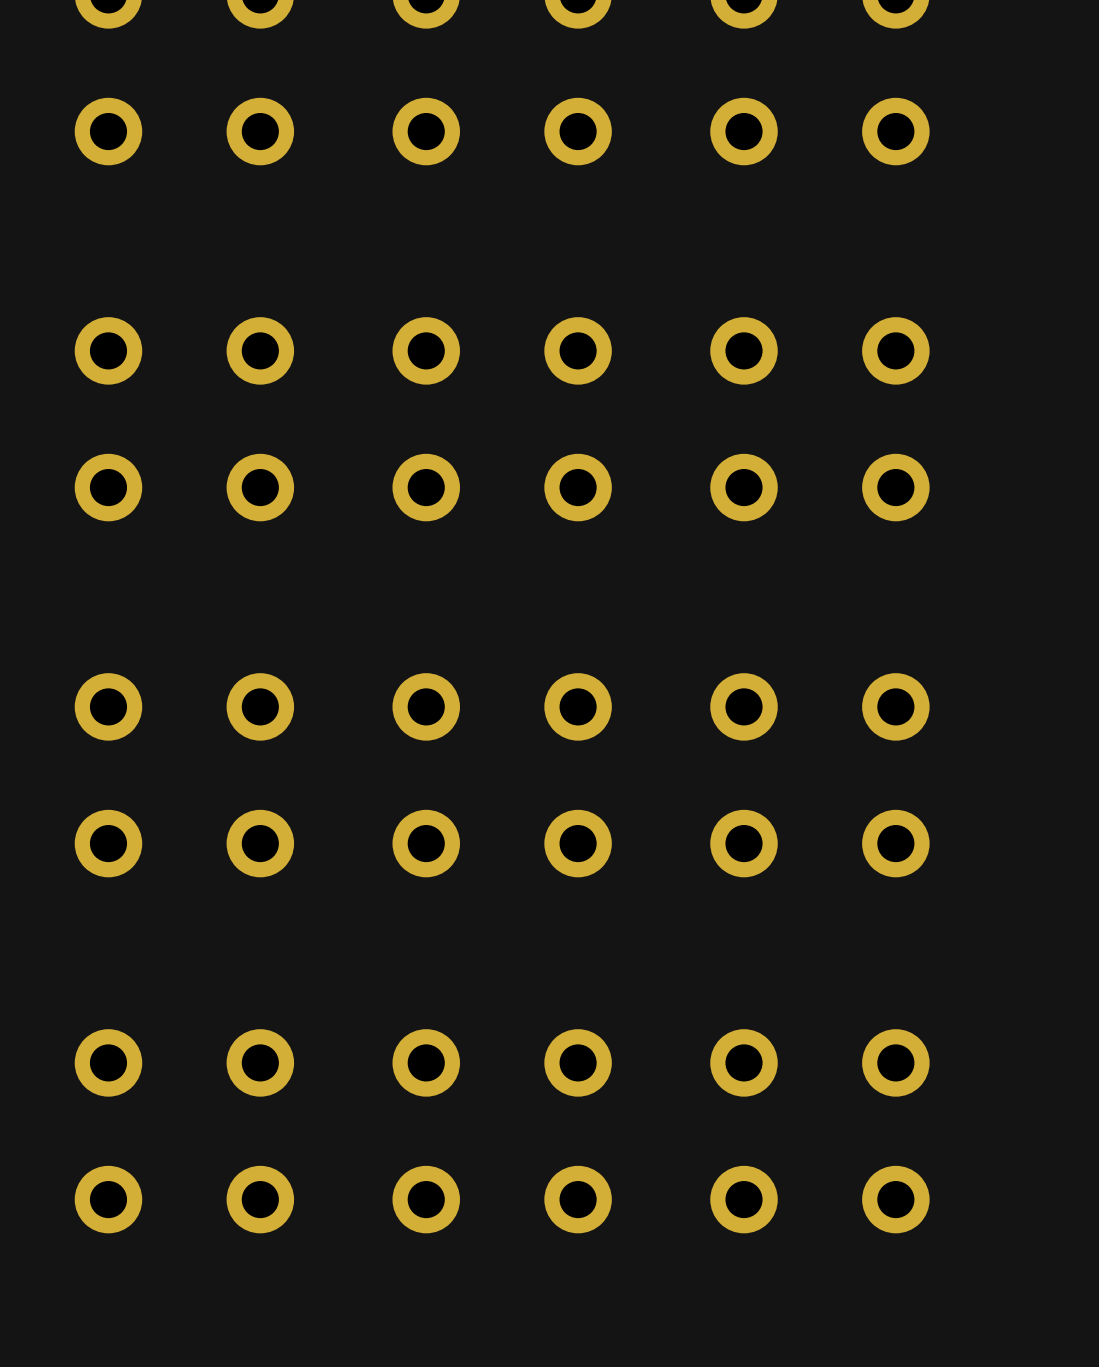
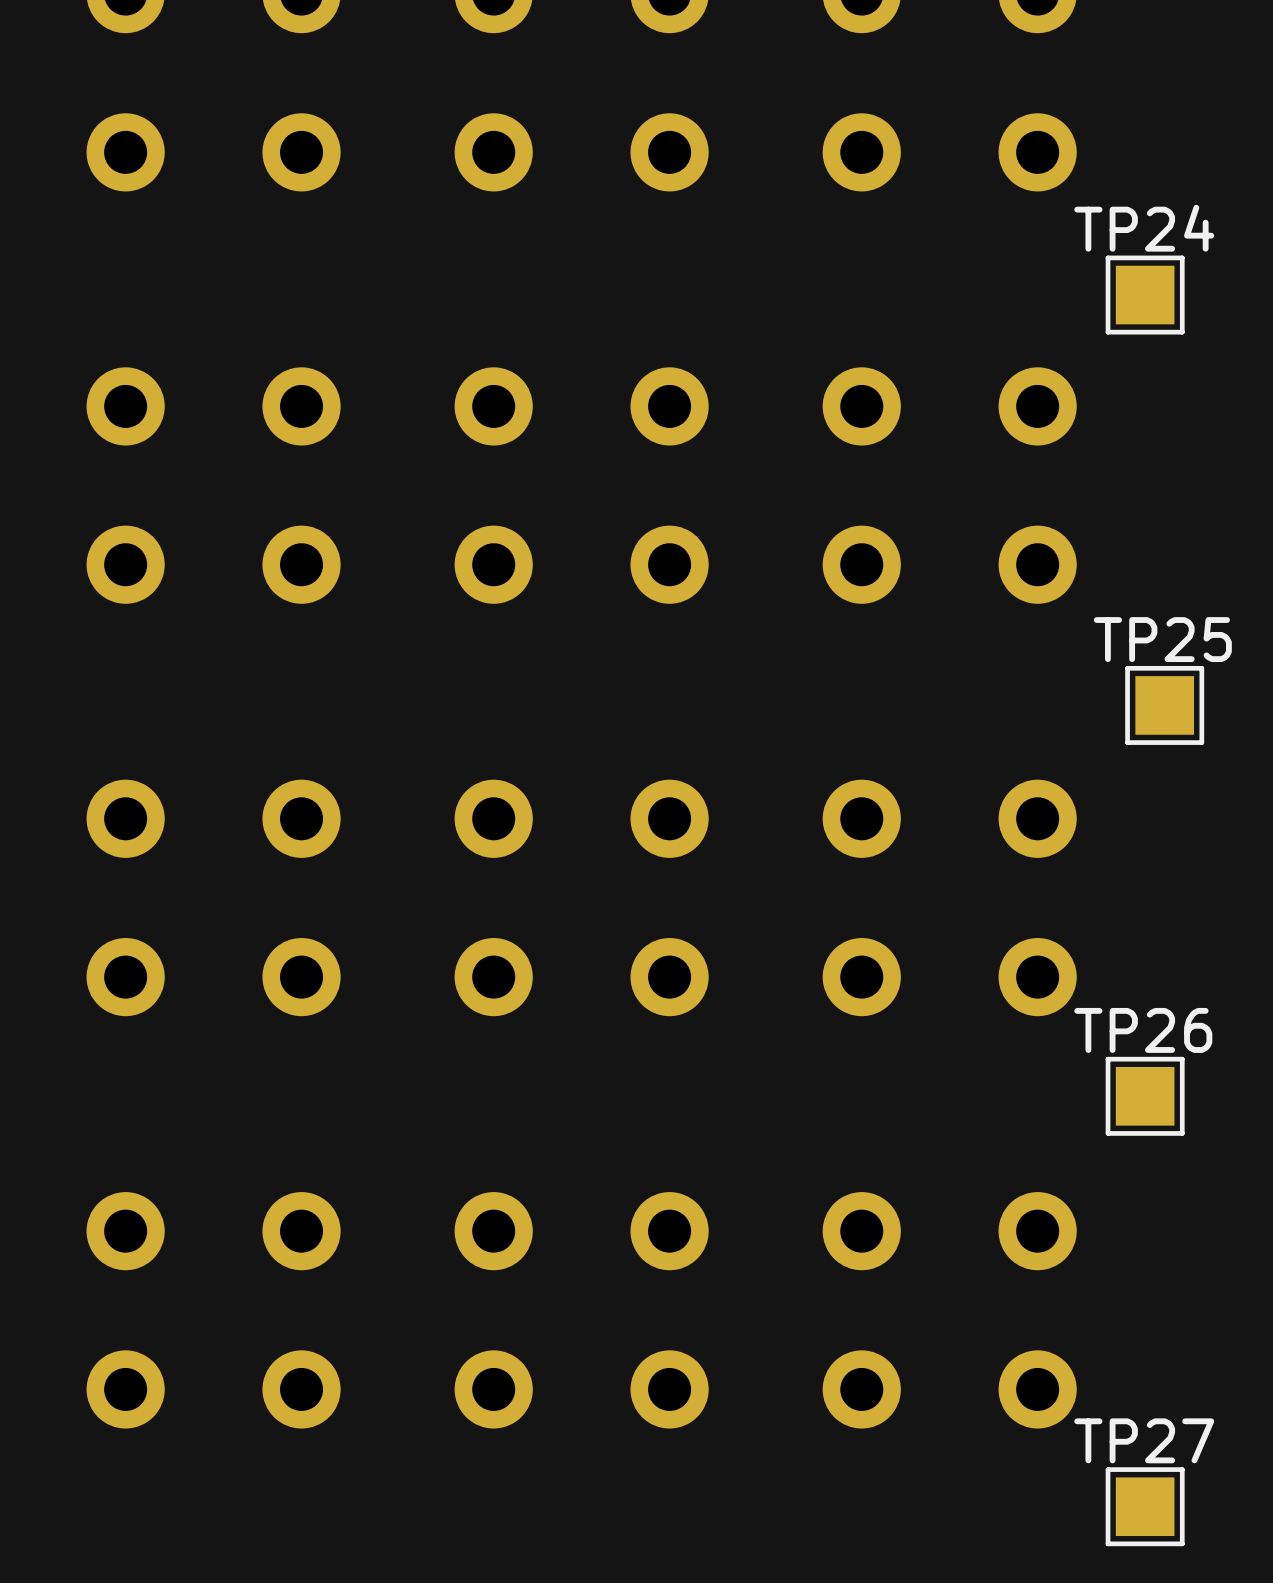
TP24: none -> (1145, 295)
TP25: none -> (1164, 705)
TP26: none -> (1145, 1096)
TP27: none -> (1145, 1506)

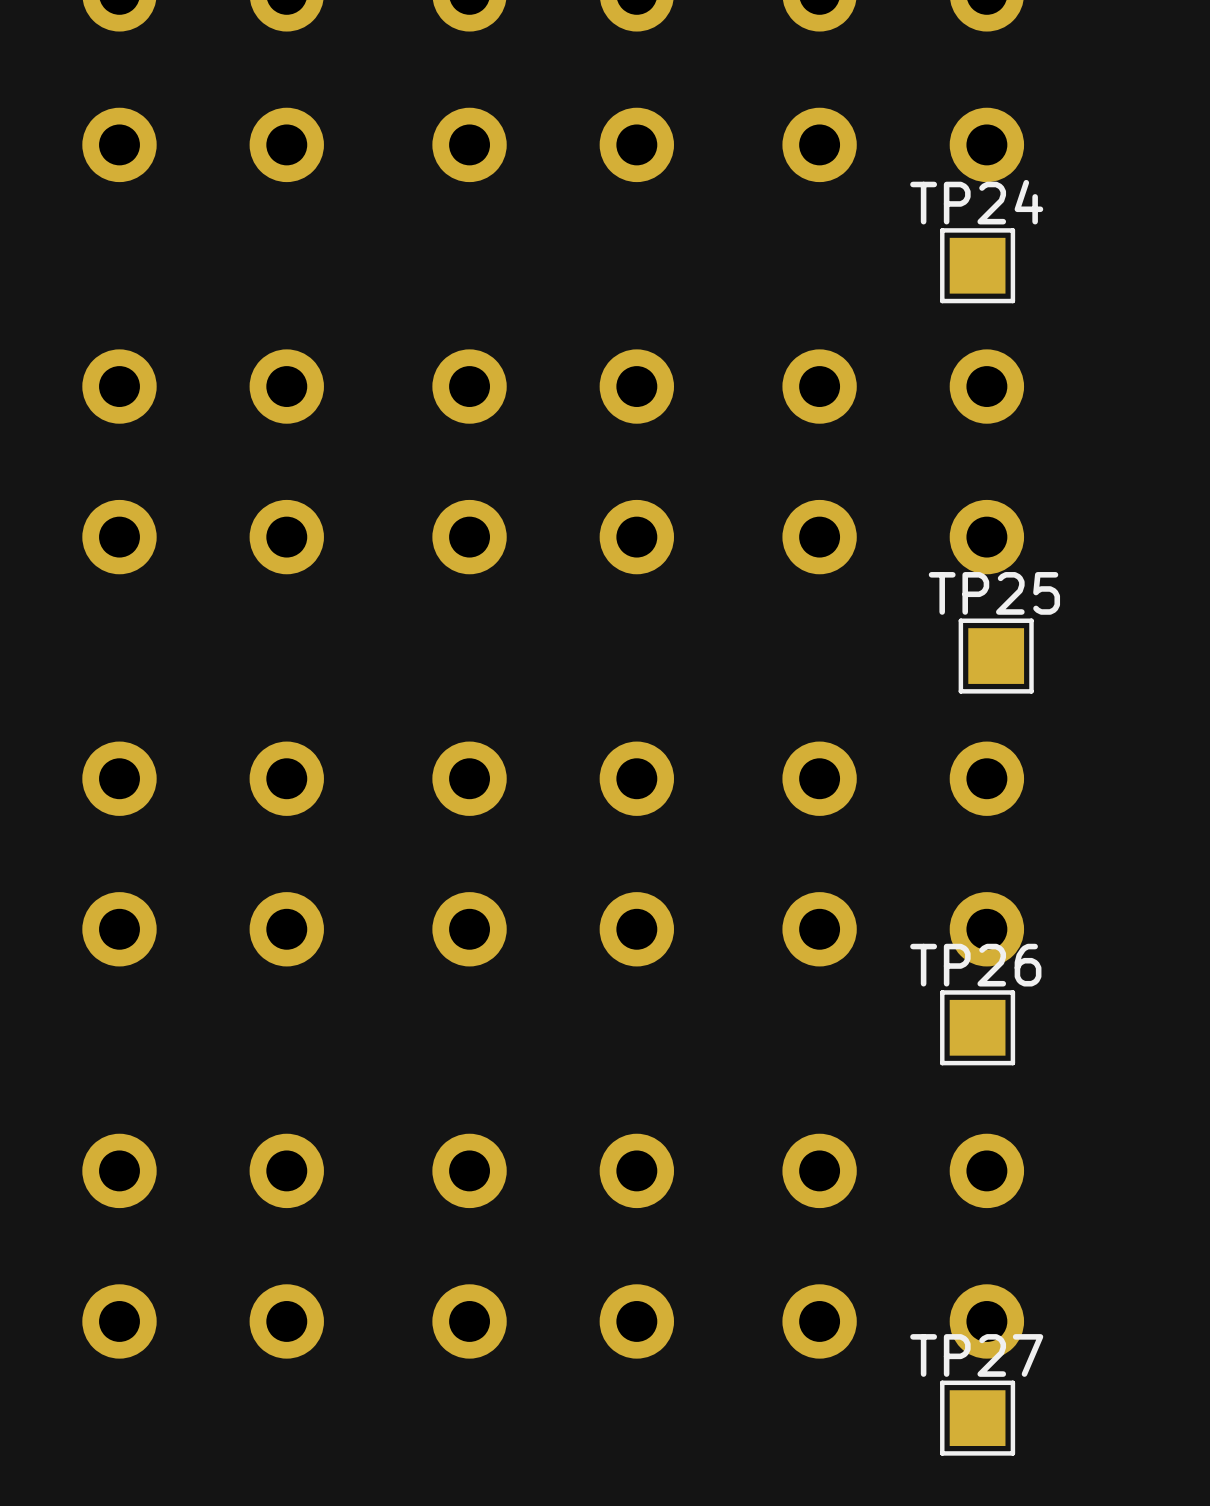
TP24 position: (1145, 295) -> (977, 265)
TP25 position: (1164, 705) -> (996, 656)
TP26 position: (1145, 1096) -> (977, 1027)
TP27 position: (1145, 1506) -> (977, 1418)

